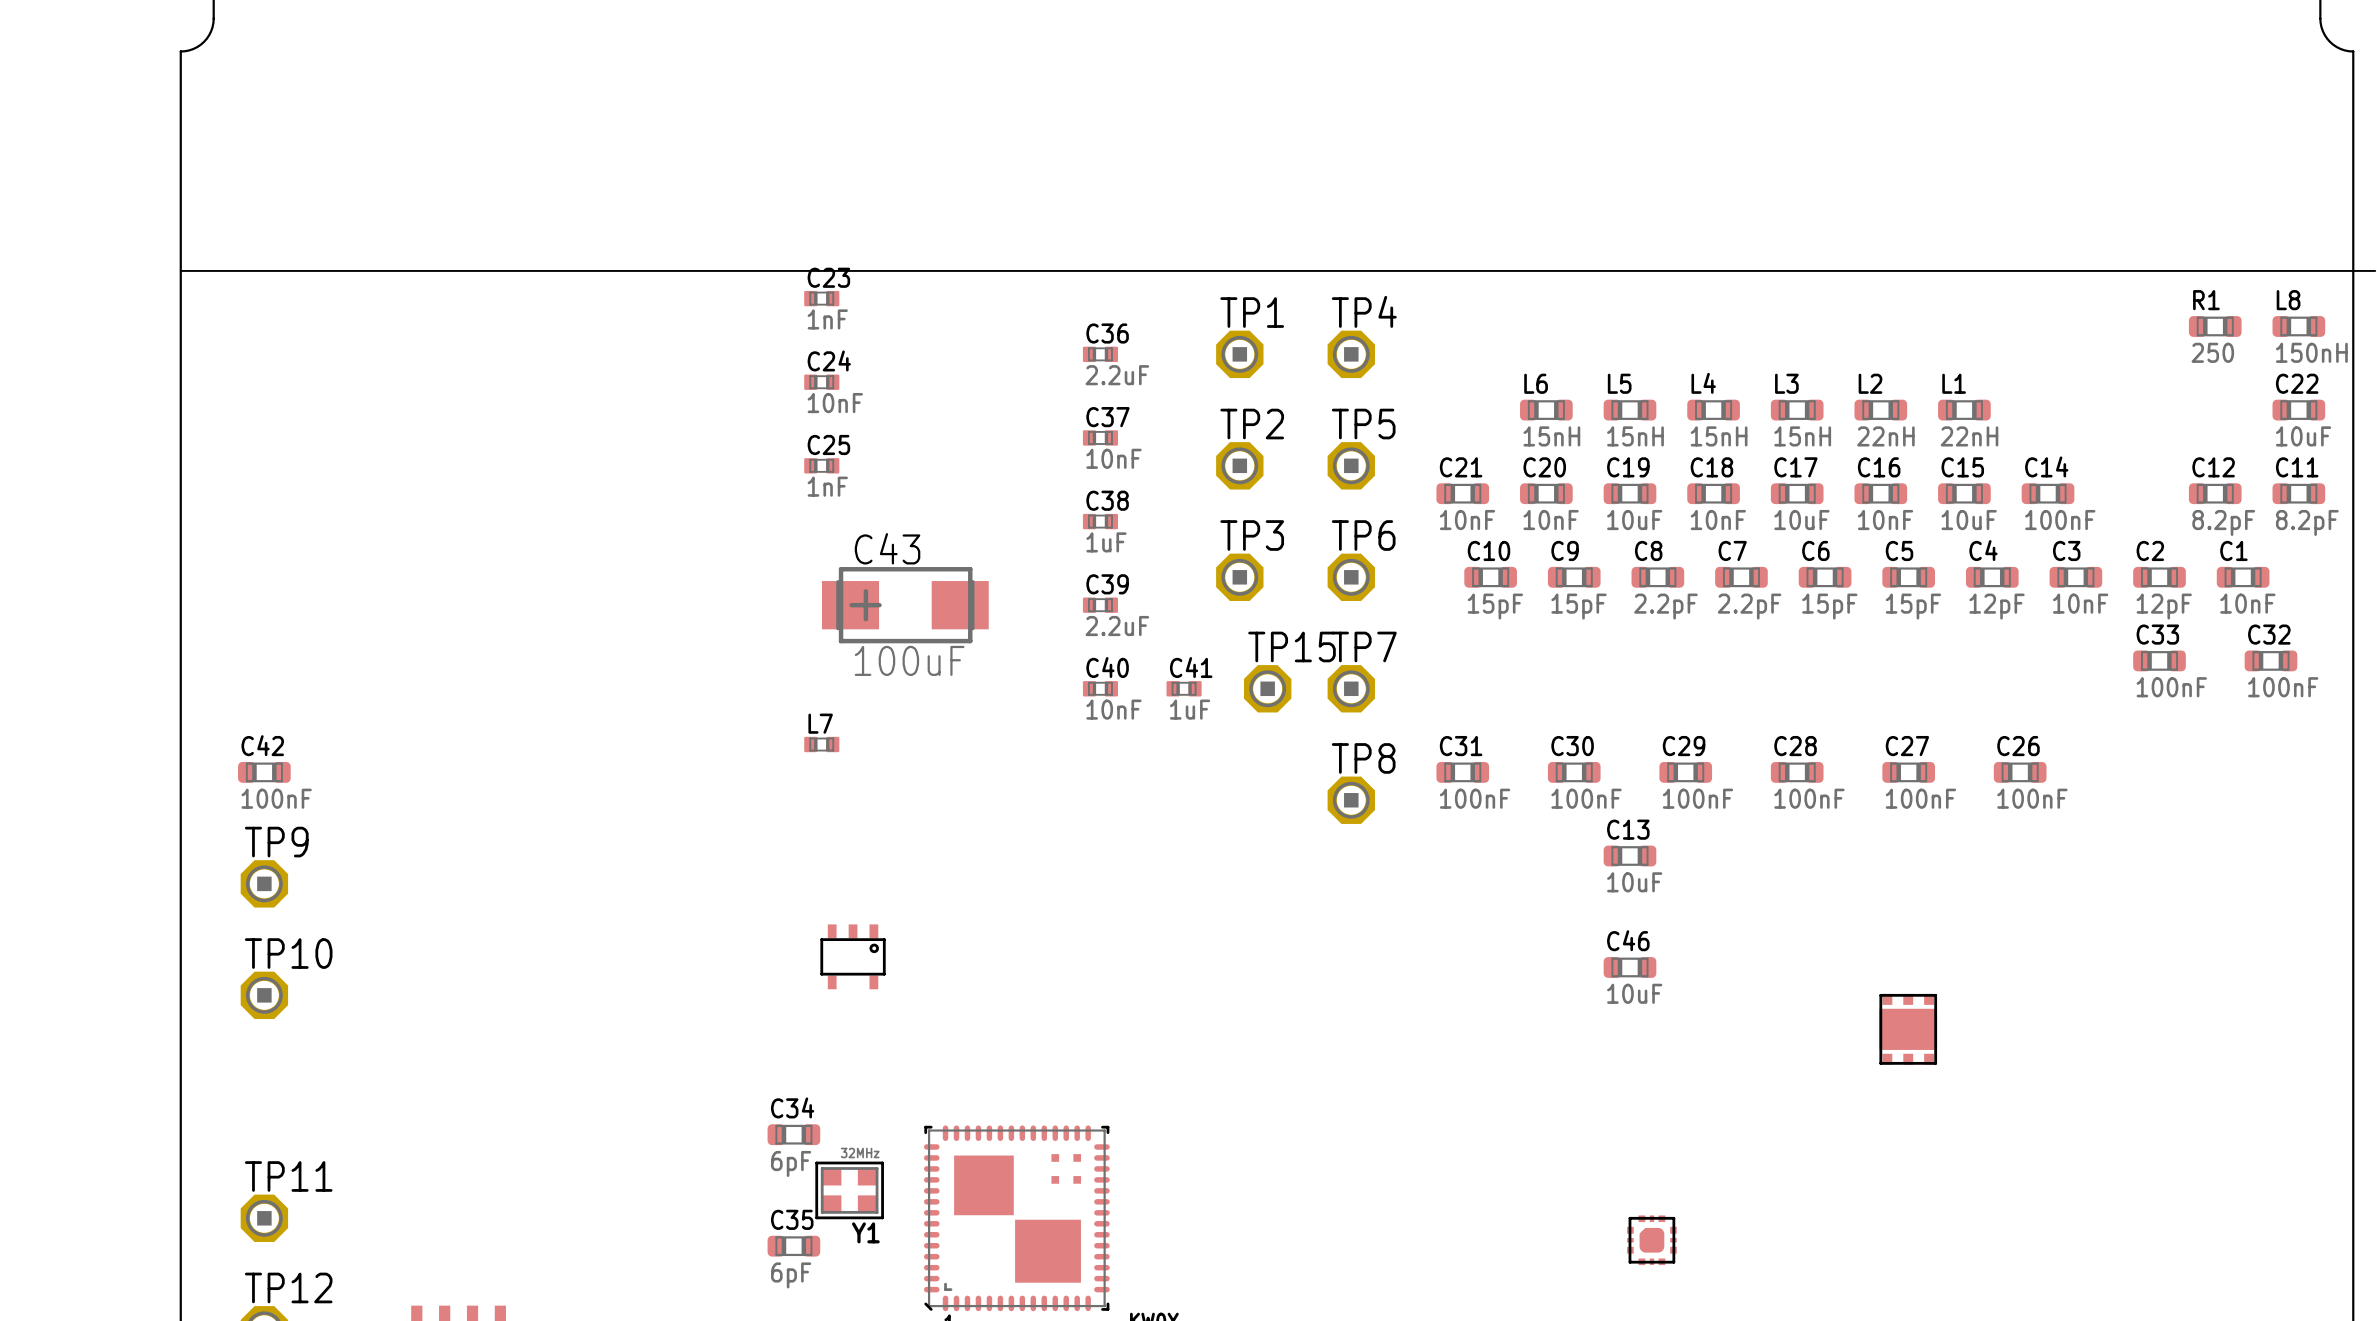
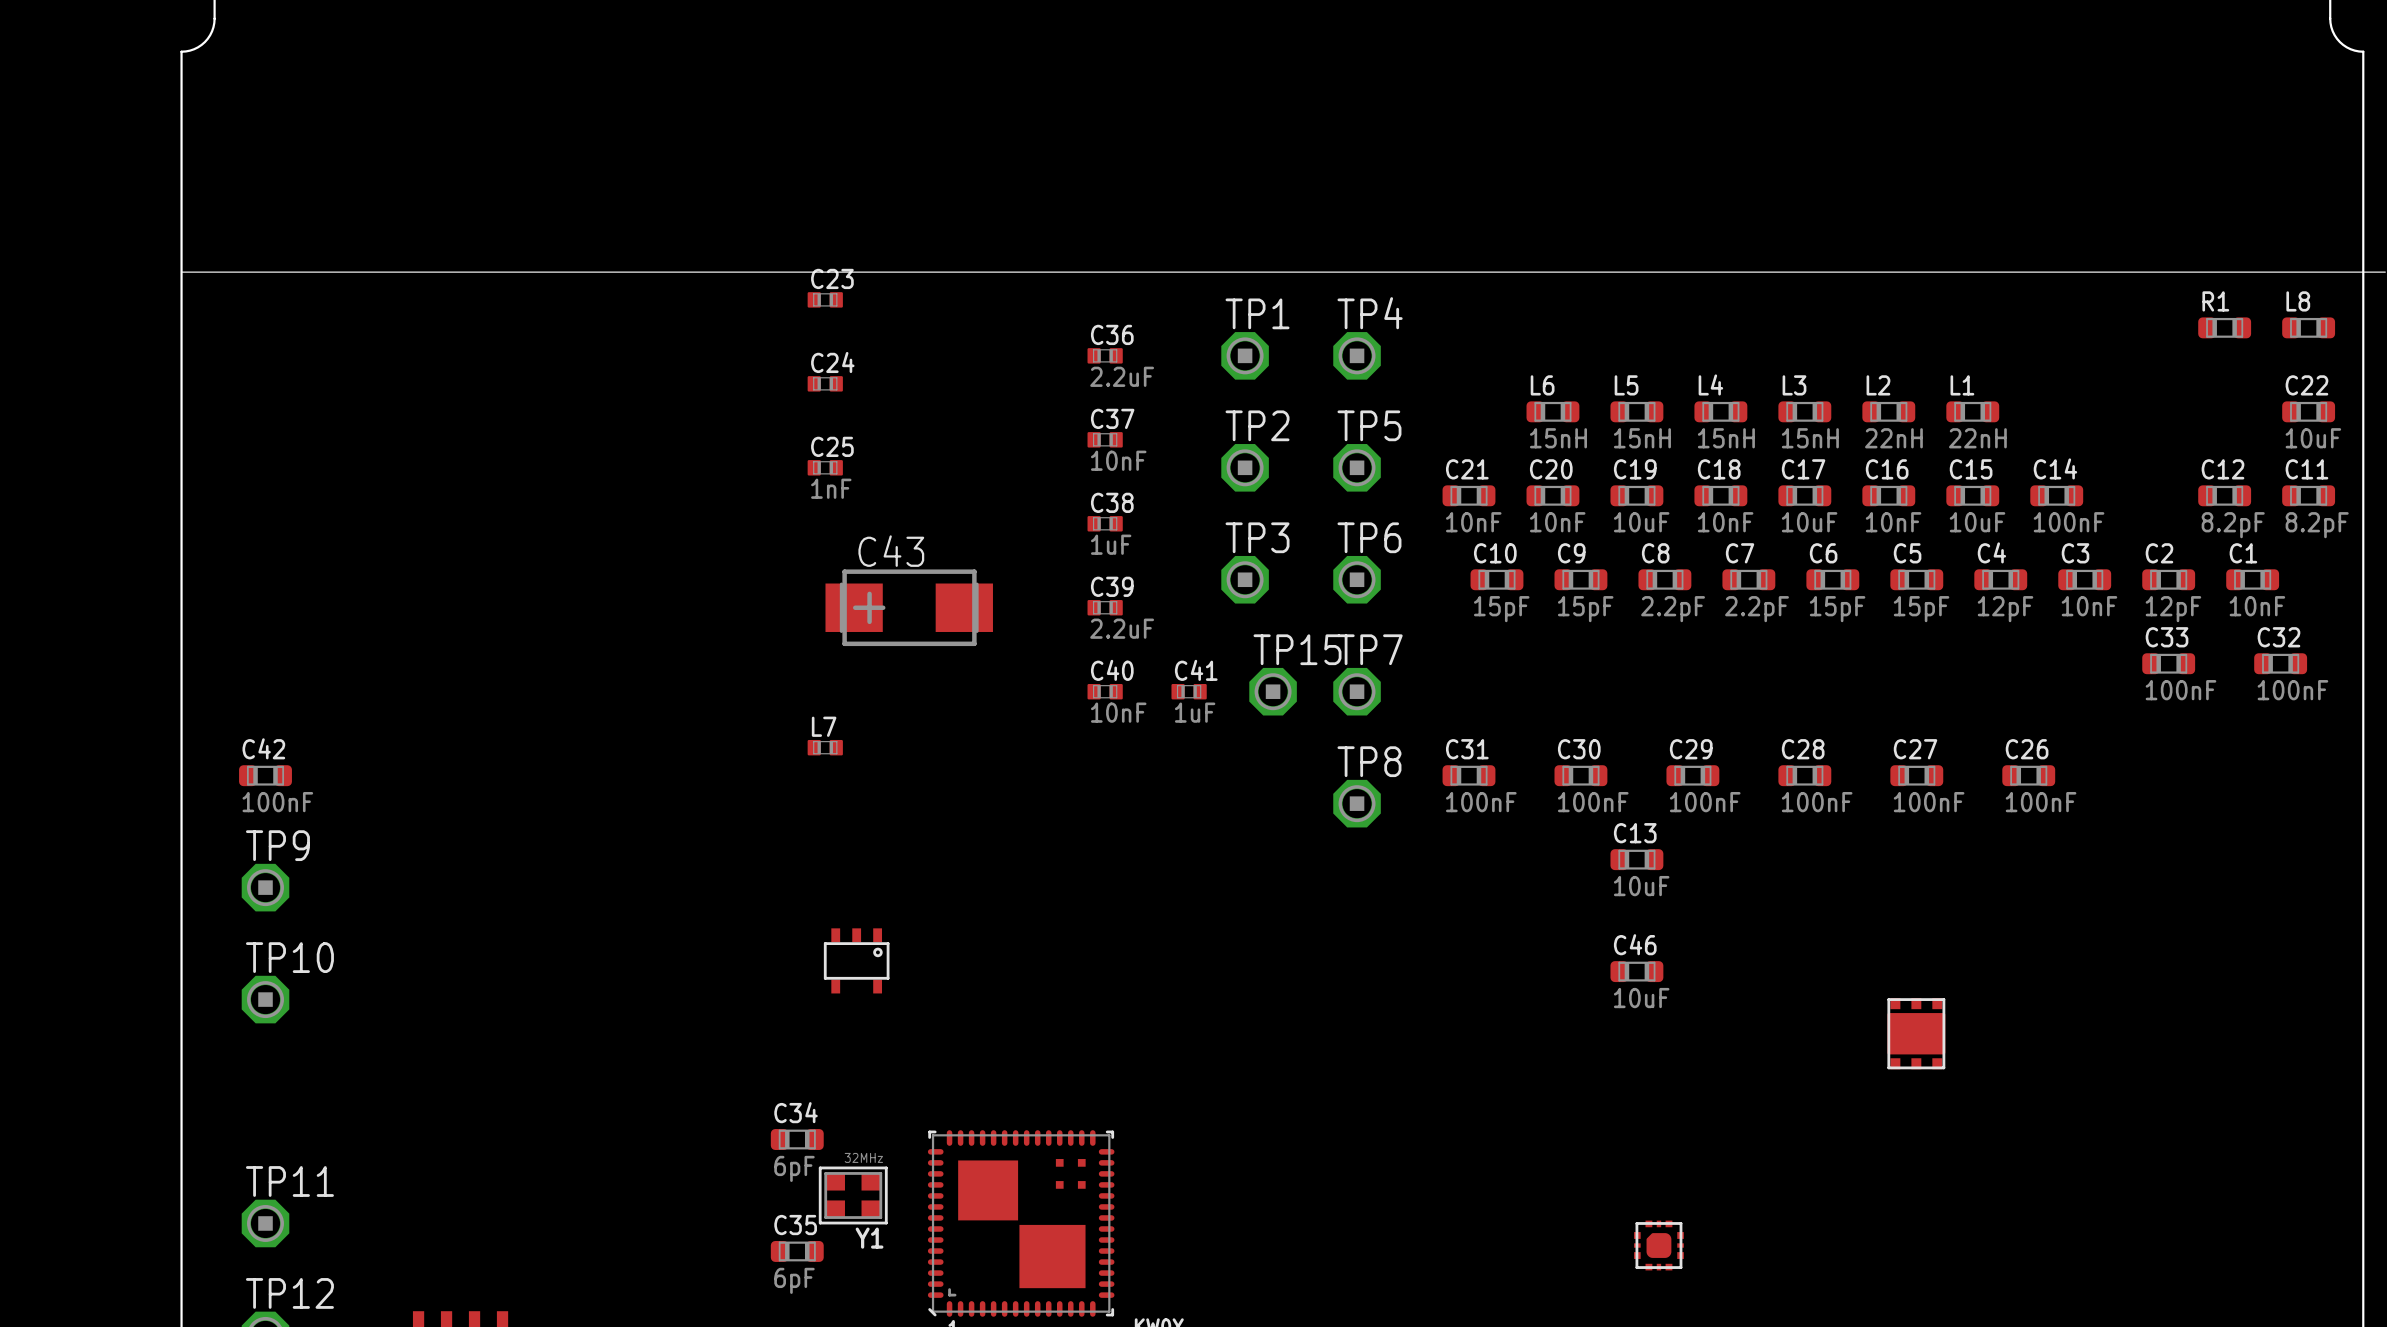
C23 value: 1nF (827, 319) -> none
R1 value: 250 (2212, 352) -> none
L8 value: 150nH (2311, 352) -> none
C24 value: 10nF (835, 403) -> none
C43 value: 100uF (909, 660) -> none

